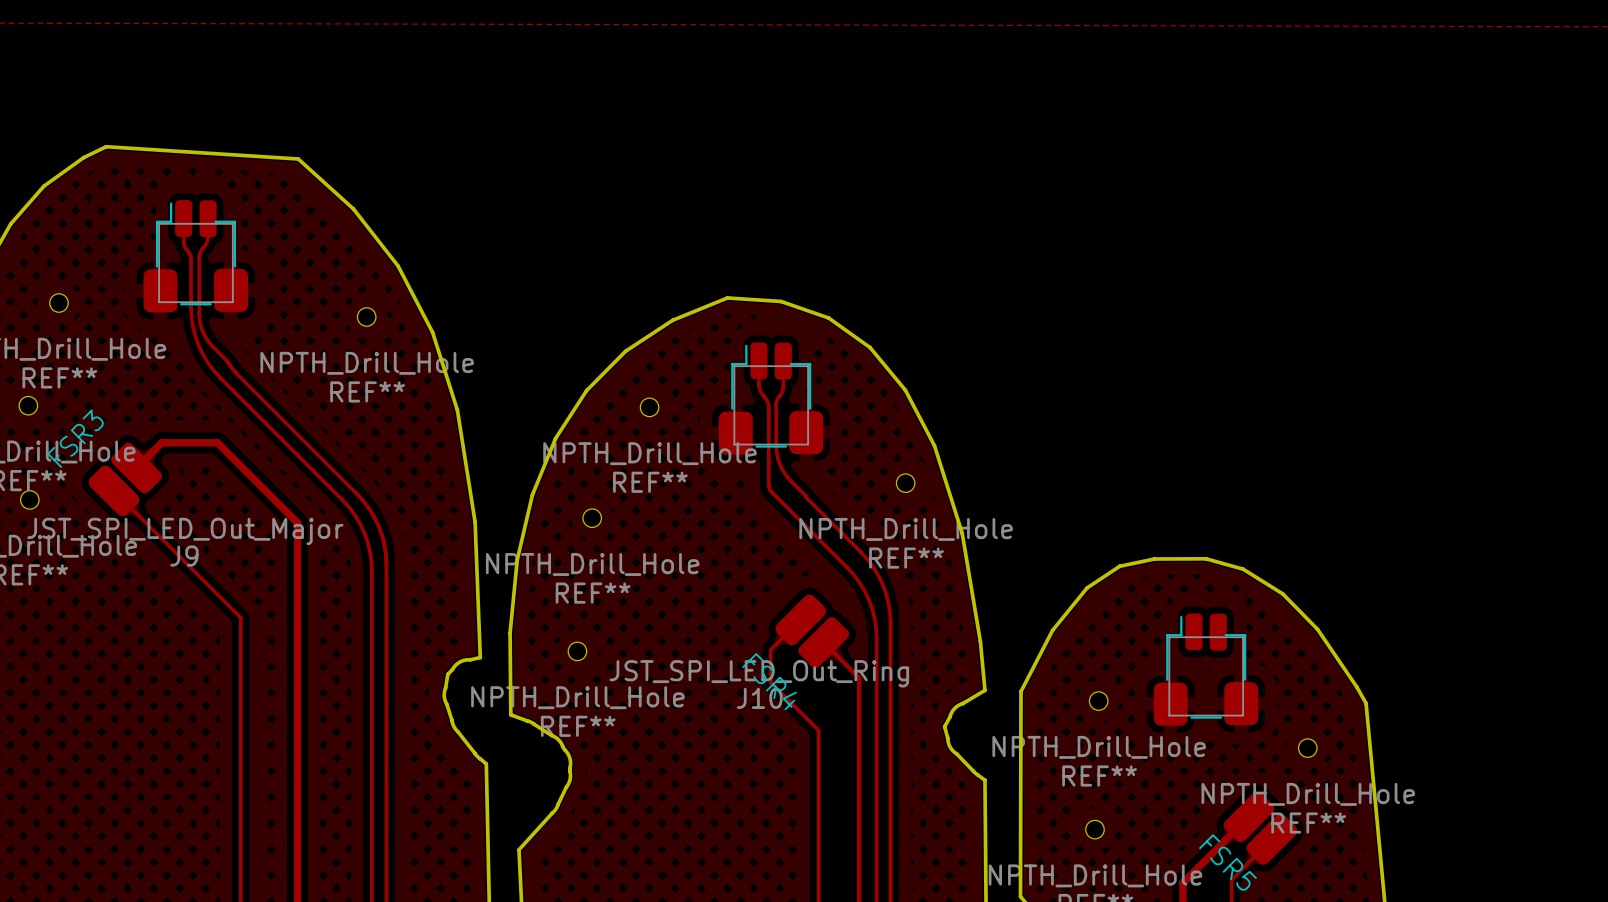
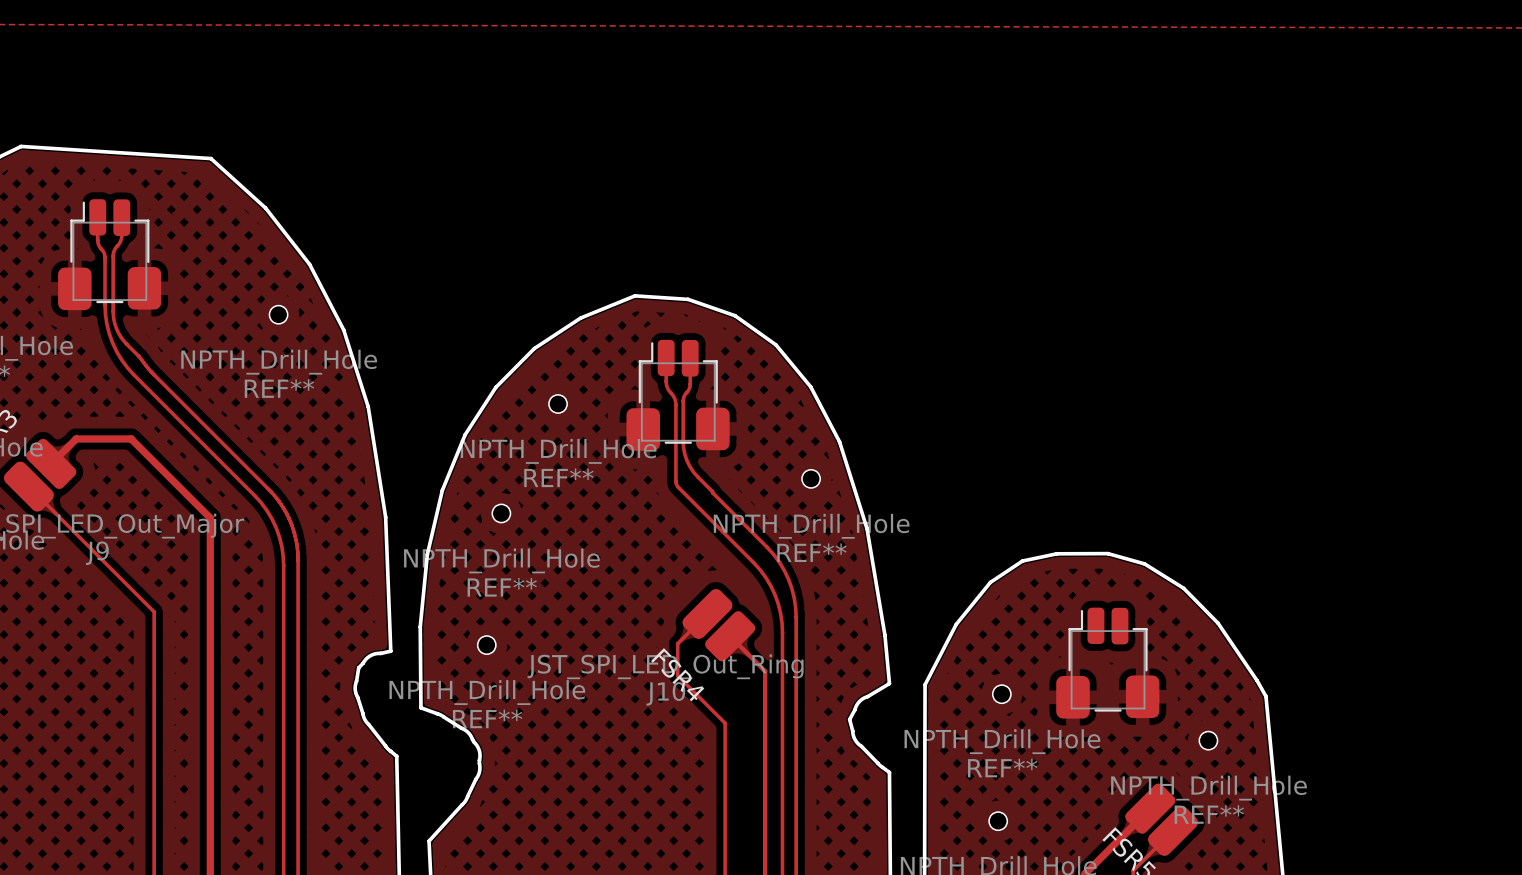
J9 footprint: [143, 200, 248, 313] -> [58, 199, 162, 311]
J10 footprint: [718, 342, 824, 455] -> [626, 339, 730, 451]
part footprint: [1153, 613, 1259, 726] -> [1056, 607, 1160, 719]

